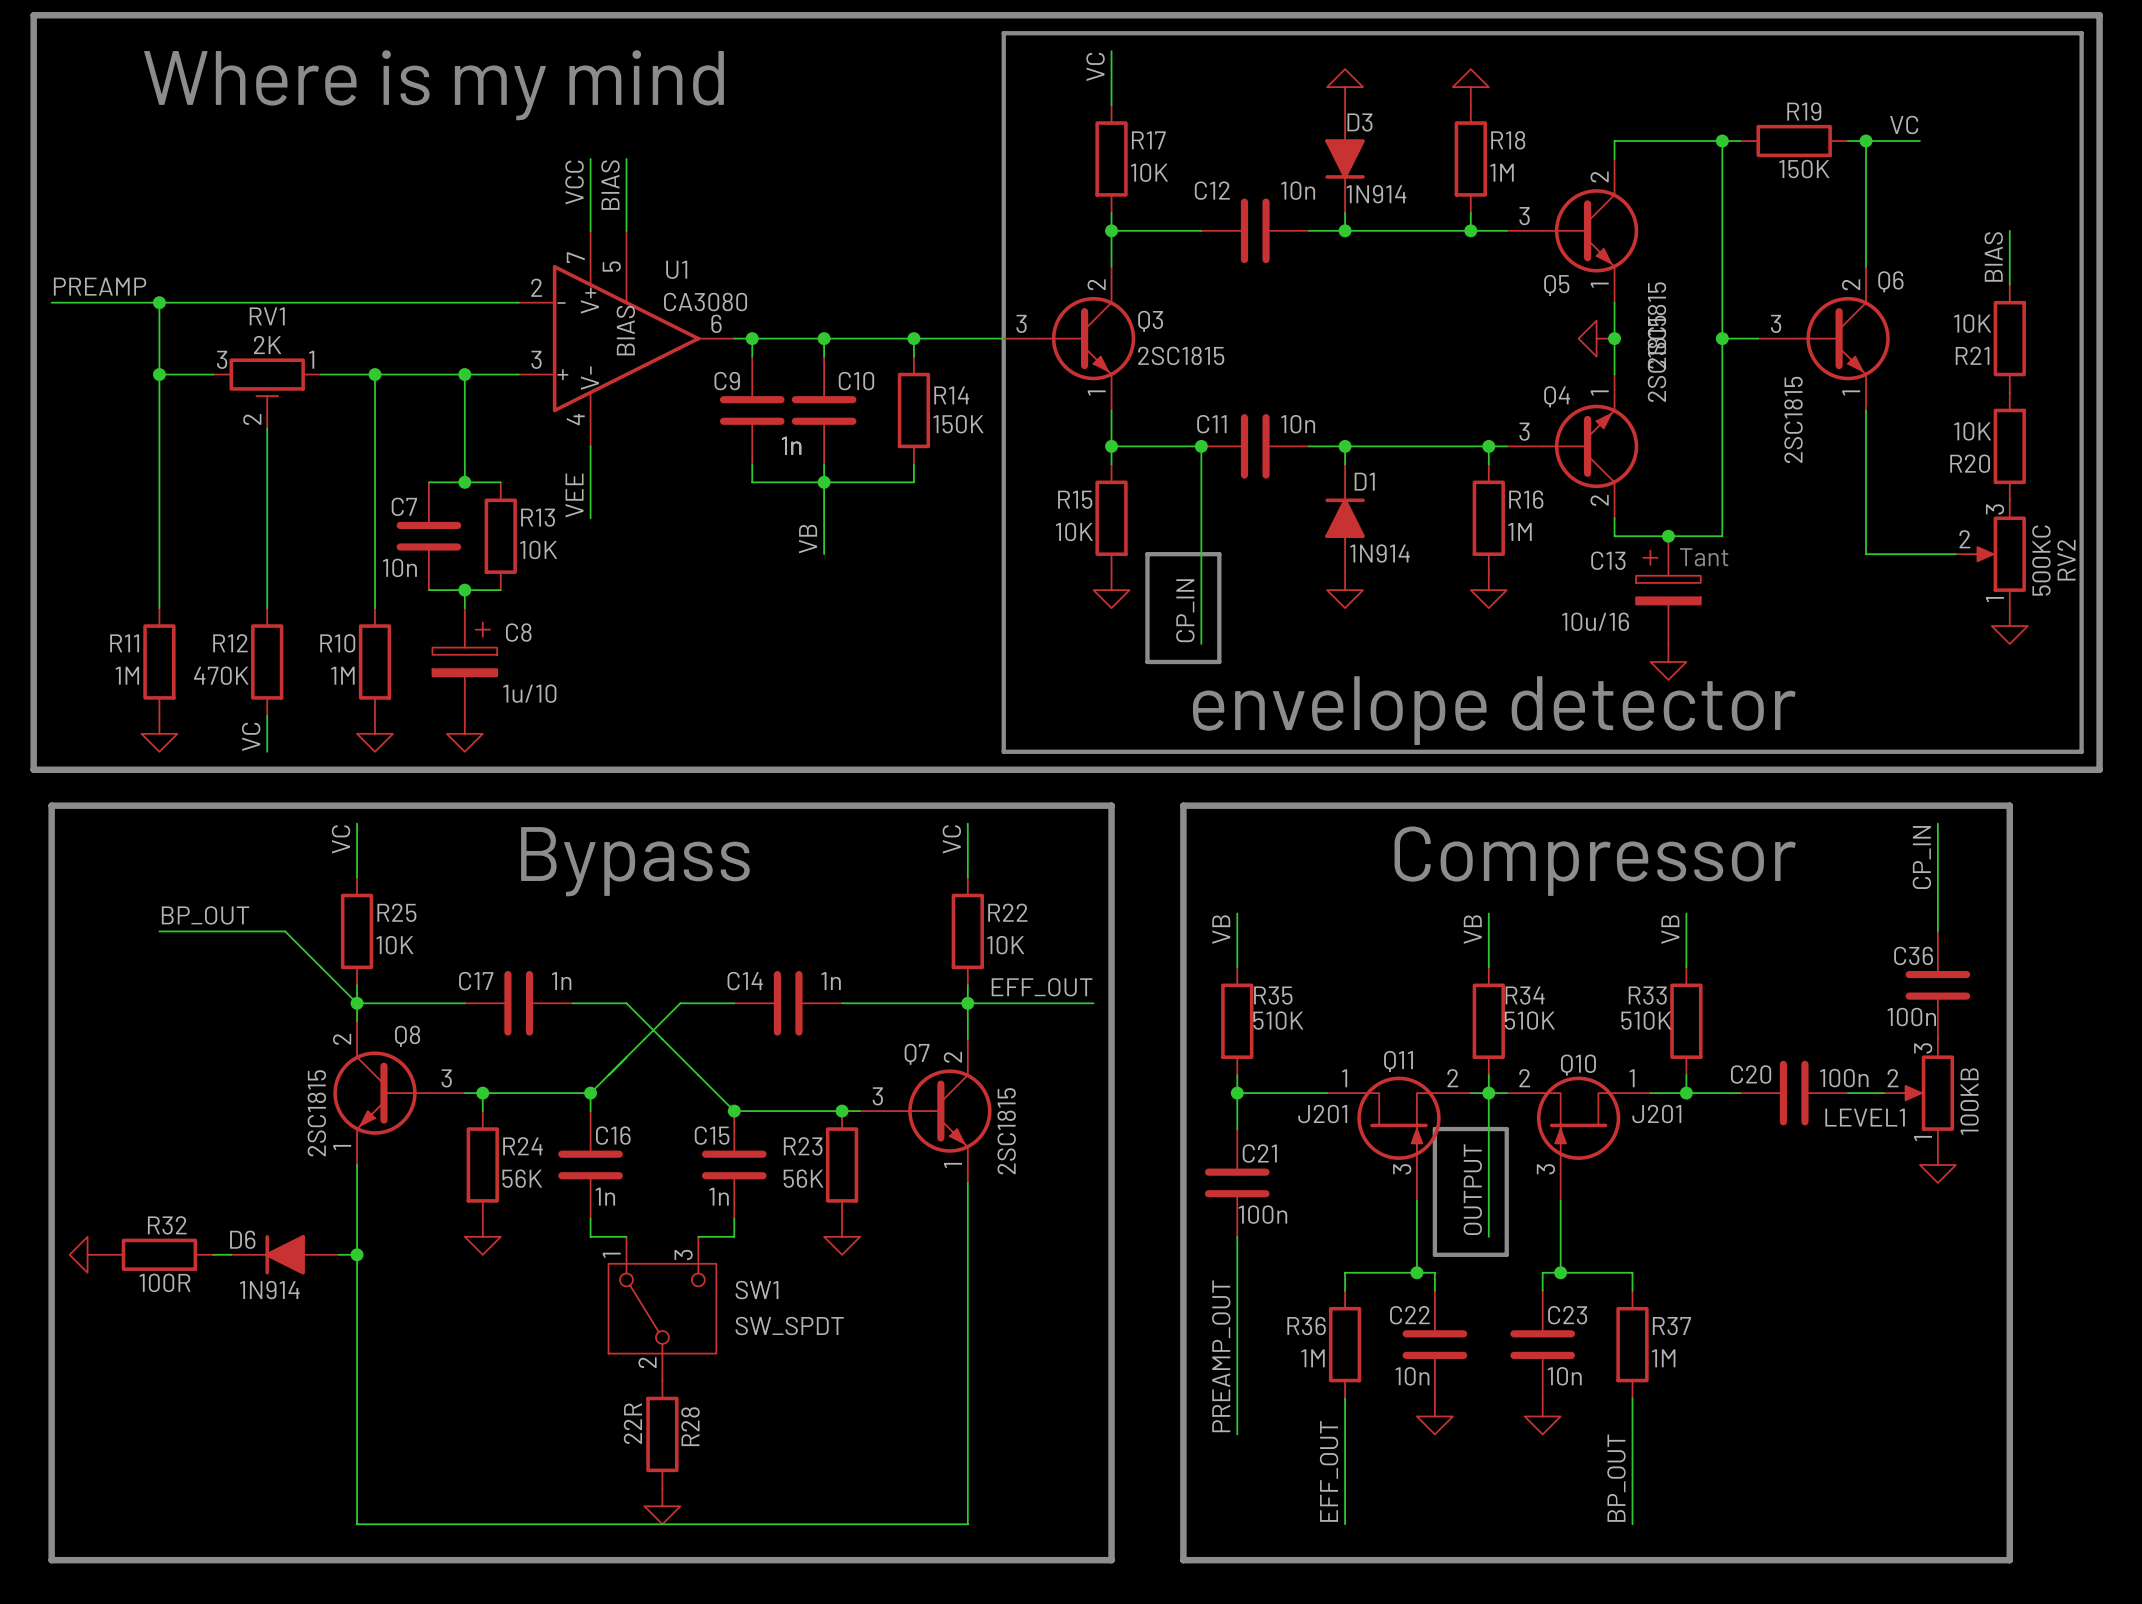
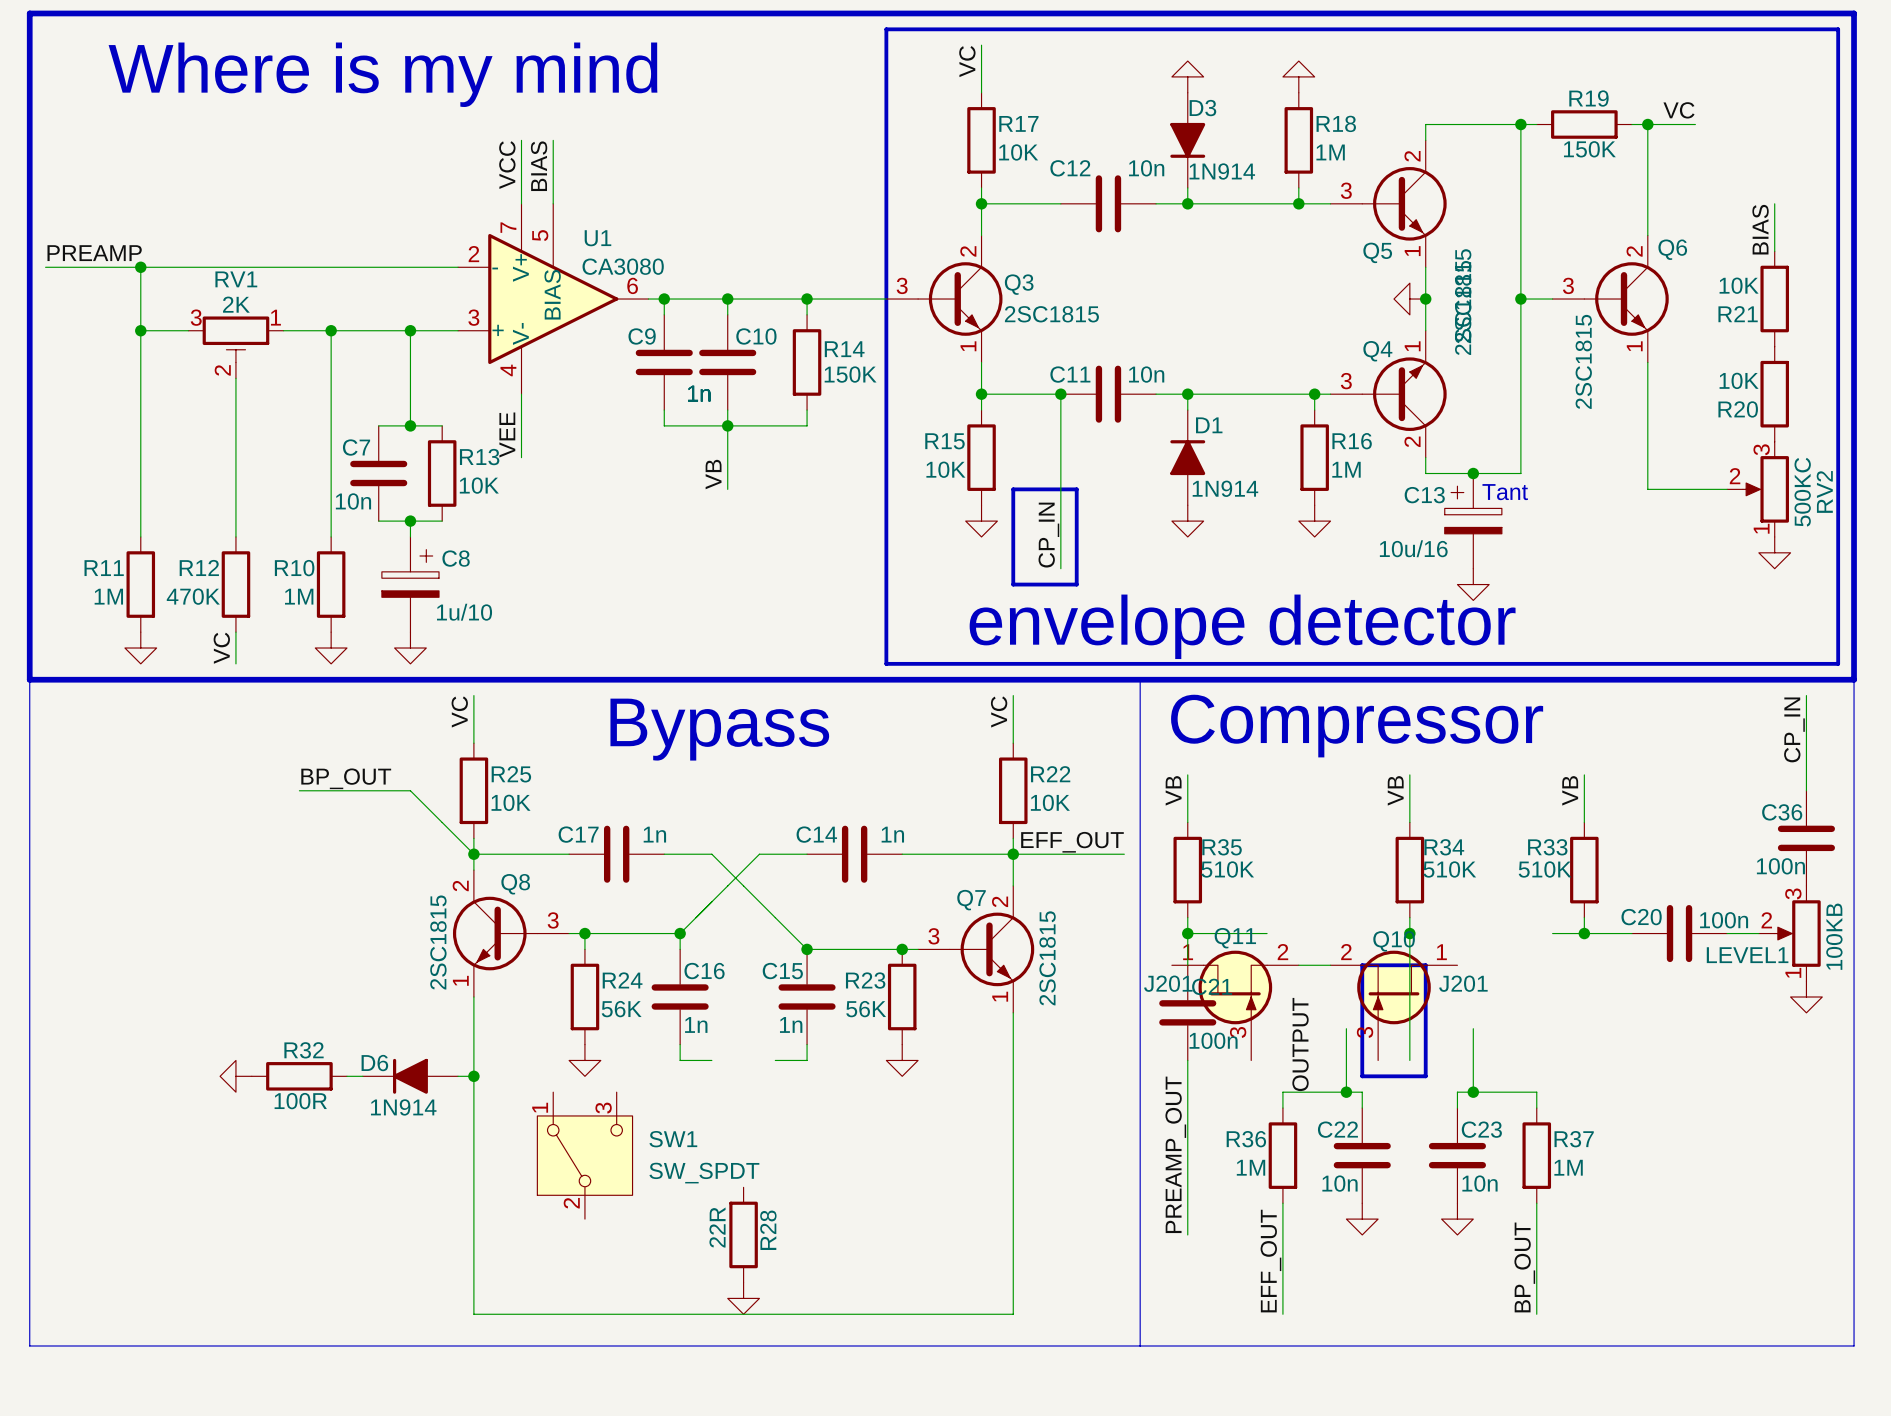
text position: envelope detector (1494, 710) -> envelope detector (1242, 626)
line: none -> (29, 679) (29, 1345) (1854, 1345) (1854, 679)
line: none -> (1140, 679) (1140, 1345)
line: (51, 805) (1111, 805) (1111, 1560) (51, 1560) (51, 805) -> none
line: (1183, 805) (2009, 805) (2009, 1560) (1183, 1560) (1183, 805) -> none
wire: (357, 823) (357, 877) -> (473, 695) (473, 743)
wire: (967, 823) (967, 877) -> (1013, 695) (1013, 743)
wire: (1937, 823) (1937, 931) -> (1806, 695) (1806, 790)
label position: VC (341, 839) -> VC (459, 712)
label position: VC (951, 839) -> VC (999, 712)
label position: CP_IN (1921, 857) -> CP_IN (1794, 729)
text position: Bypass (635, 861) -> Bypass (719, 729)
text position: Compressor (1595, 861) -> Compressor (1357, 726)
label: none -> VB (1173, 790)
label: none -> VB (1395, 790)
label: none -> VB (1570, 790)
wire: (1237, 913) (1237, 967) -> (1187, 774) (1187, 822)
wire: (1488, 913) (1488, 967) -> (1409, 774) (1409, 822)
wire: (1686, 913) (1686, 967) -> (1584, 774) (1584, 822)
label position: BP_OUT (205, 915) -> BP_OUT (346, 778)
label: VB (1221, 929) -> none
label: VB (1472, 929) -> none
label: VB (1670, 929) -> none
wire: (159, 931) (285, 931) (357, 1003) (464, 1003) -> (299, 790) (410, 790) (473, 854) (569, 854)
R25 position: (357, 931) -> (473, 790)
R22 position: (967, 931) -> (1013, 790)
junction: none -> (473, 854)
junction: none -> (1013, 854)
wire: (357, 985) (357, 1021) -> (473, 838) (473, 870)
wire: (967, 985) (967, 1039) -> (1013, 838) (1013, 885)
C36 position: (1937, 985) -> (1806, 838)
label position: EFF_OUT (1042, 987) -> EFF_OUT (1072, 842)
junction: (357, 1003) -> none
C17 position: (518, 1003) -> (616, 854)
wire: (572, 1003) (626, 1003) (734, 1111) (860, 1111) -> (664, 854) (711, 854) (807, 949) (918, 949)
wire: (734, 1003) (680, 1003) (590, 1093) -> (807, 854) (759, 854) (680, 933)
C14 position: (788, 1003) -> (854, 854)
wire: (842, 1003) (1093, 1003) -> (902, 854) (1124, 854)
junction: (967, 1003) -> none
R35 position: (1237, 1021) -> (1187, 870)
R34 position: (1488, 1021) -> (1409, 870)
R33 position: (1686, 1021) -> (1584, 870)
junction: none -> (584, 933)
junction: none -> (680, 933)
junction: none -> (1187, 933)
junction: none -> (1409, 933)
junction: none -> (1584, 933)
junction: none -> (807, 949)
junction: none -> (902, 949)
wire: (1237, 1075) (1237, 1129) -> (1187, 917) (1187, 965)
wire: (1488, 1075) (1488, 1236) -> (1409, 917) (1409, 1060)
wire: (1686, 1075) (1686, 1093) -> (1584, 917) (1584, 933)
Q8 position: (399, 1093) -> (511, 933)
wire: (464, 1093) (590, 1093) -> (569, 933) (680, 933)
wire: (482, 1093) (482, 1111) -> (584, 933) (584, 949)
junction: (482, 1093) -> none
wire: (590, 1093) (590, 1111) -> (680, 933) (680, 949)
junction: (590, 1093) -> none
wire: (1237, 1093) (1327, 1093) -> (1187, 933) (1267, 933)
junction: (1237, 1093) -> none
junction: (1488, 1093) -> none
wire: (1650, 1093) (1740, 1093) -> (1552, 933) (1631, 933)
junction: (1686, 1093) -> none
C20 position: (1794, 1093) -> (1679, 933)
wire: (1848, 1093) (1884, 1093) -> (1727, 933) (1758, 933)
LEVEL1 position: (1919, 1093) -> (1789, 933)
junction: (734, 1111) -> none
junction: (842, 1111) -> none
Q7 position: (925, 1111) -> (976, 949)
line: (1434, 1129) (1506, 1129) (1506, 1254) (1434, 1254) (1434, 1129) -> (1362, 965) (1425, 965) (1425, 1076) (1362, 1076) (1362, 965)
wire: (357, 1164) (357, 1524) (967, 1524) (967, 1182) -> (473, 997) (473, 1314) (1013, 1314) (1013, 1012)
R24 position: (482, 1164) -> (584, 997)
C16 position: (590, 1164) -> (680, 997)
C15 position: (734, 1164) -> (807, 997)
R23 position: (842, 1164) -> (902, 997)
power symbol position: (1937, 1164) -> (1806, 997)
C21 position: (1237, 1182) -> (1187, 1012)
power symbol: none -> (584, 1060)
power symbol: none -> (902, 1060)
wire: (1416, 1200) (1416, 1272) -> (1346, 1028) (1346, 1092)
wire: (1560, 1200) (1560, 1272) -> (1473, 1028) (1473, 1092)
power symbol: none -> (235, 1076)
junction: none -> (473, 1076)
wire: (590, 1218) (590, 1236) (626, 1236) -> (680, 1044) (680, 1060) (711, 1060)
wire: (734, 1218) (734, 1236) (698, 1236) -> (807, 1044) (807, 1060) (775, 1060)
power symbol: (482, 1236) -> none
power symbol: (842, 1236) -> none
wire: (1237, 1236) (1237, 1434) -> none
junction: none -> (1473, 1092)
power symbol: (87, 1254) -> none
R32 position: (159, 1254) -> (299, 1076)
wire: (213, 1254) (231, 1254) -> (347, 1076) (362, 1076)
D6 position: (285, 1254) -> (410, 1076)
wire: (339, 1254) (357, 1254) -> (458, 1076) (473, 1076)
junction: (357, 1254) -> none
wire: none -> (1282, 1108) (1282, 1092) (1362, 1092) (1362, 1108)
wire: (1345, 1272) (1434, 1272) (1434, 1290) -> (1187, 1123) (1187, 1060)
junction: (1416, 1272) -> none
junction position: (1560, 1272) -> (1346, 1092)
wire: (1542, 1290) (1542, 1272) (1632, 1272) (1632, 1290) -> (1457, 1108) (1457, 1092) (1536, 1092) (1536, 1108)
R36 position: (1345, 1344) -> (1282, 1155)
C22 position: (1434, 1344) -> (1362, 1155)
C23 position: (1542, 1344) -> (1457, 1155)
R37 position: (1632, 1344) -> (1536, 1155)
label position: PREAMP_OUT (1221, 1356) -> PREAMP_OUT (1175, 1154)
wire: none -> (1282, 1203) (1282, 1314)
power symbol: none -> (1457, 1219)
wire: (1345, 1398) (1345, 1524) -> (1187, 1234) (1187, 1139)
wire: (1632, 1398) (1632, 1524) -> (1536, 1203) (1536, 1314)
power symbol: (1434, 1416) -> none
power symbol position: (1542, 1416) -> (1362, 1219)
R28 position: (662, 1434) -> (743, 1234)
power symbol: none -> (743, 1298)
label position: EFF_OUT (1329, 1471) -> EFF_OUT (1270, 1261)
label position: BP_OUT (1616, 1478) -> BP_OUT (1524, 1267)
power symbol: (662, 1506) -> none

